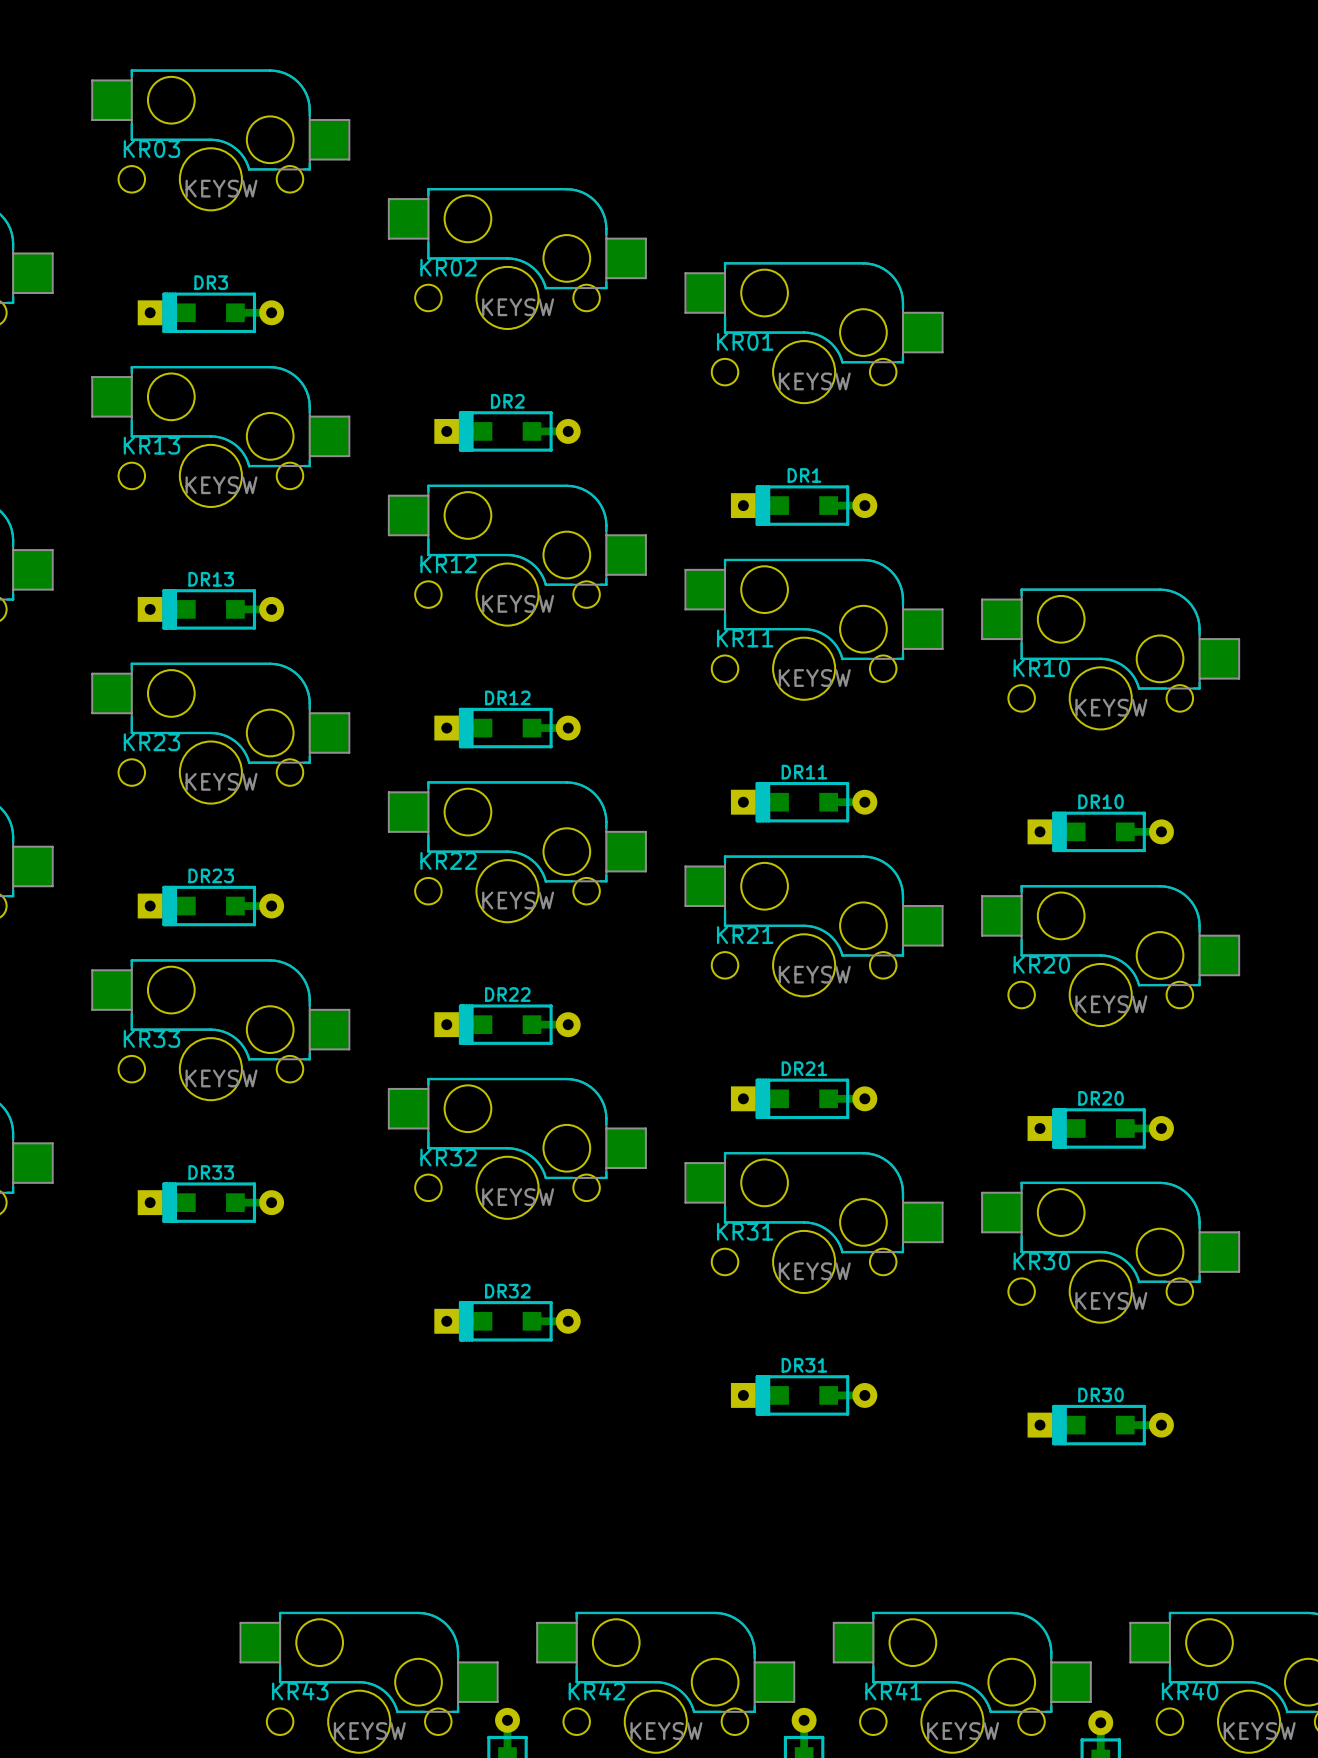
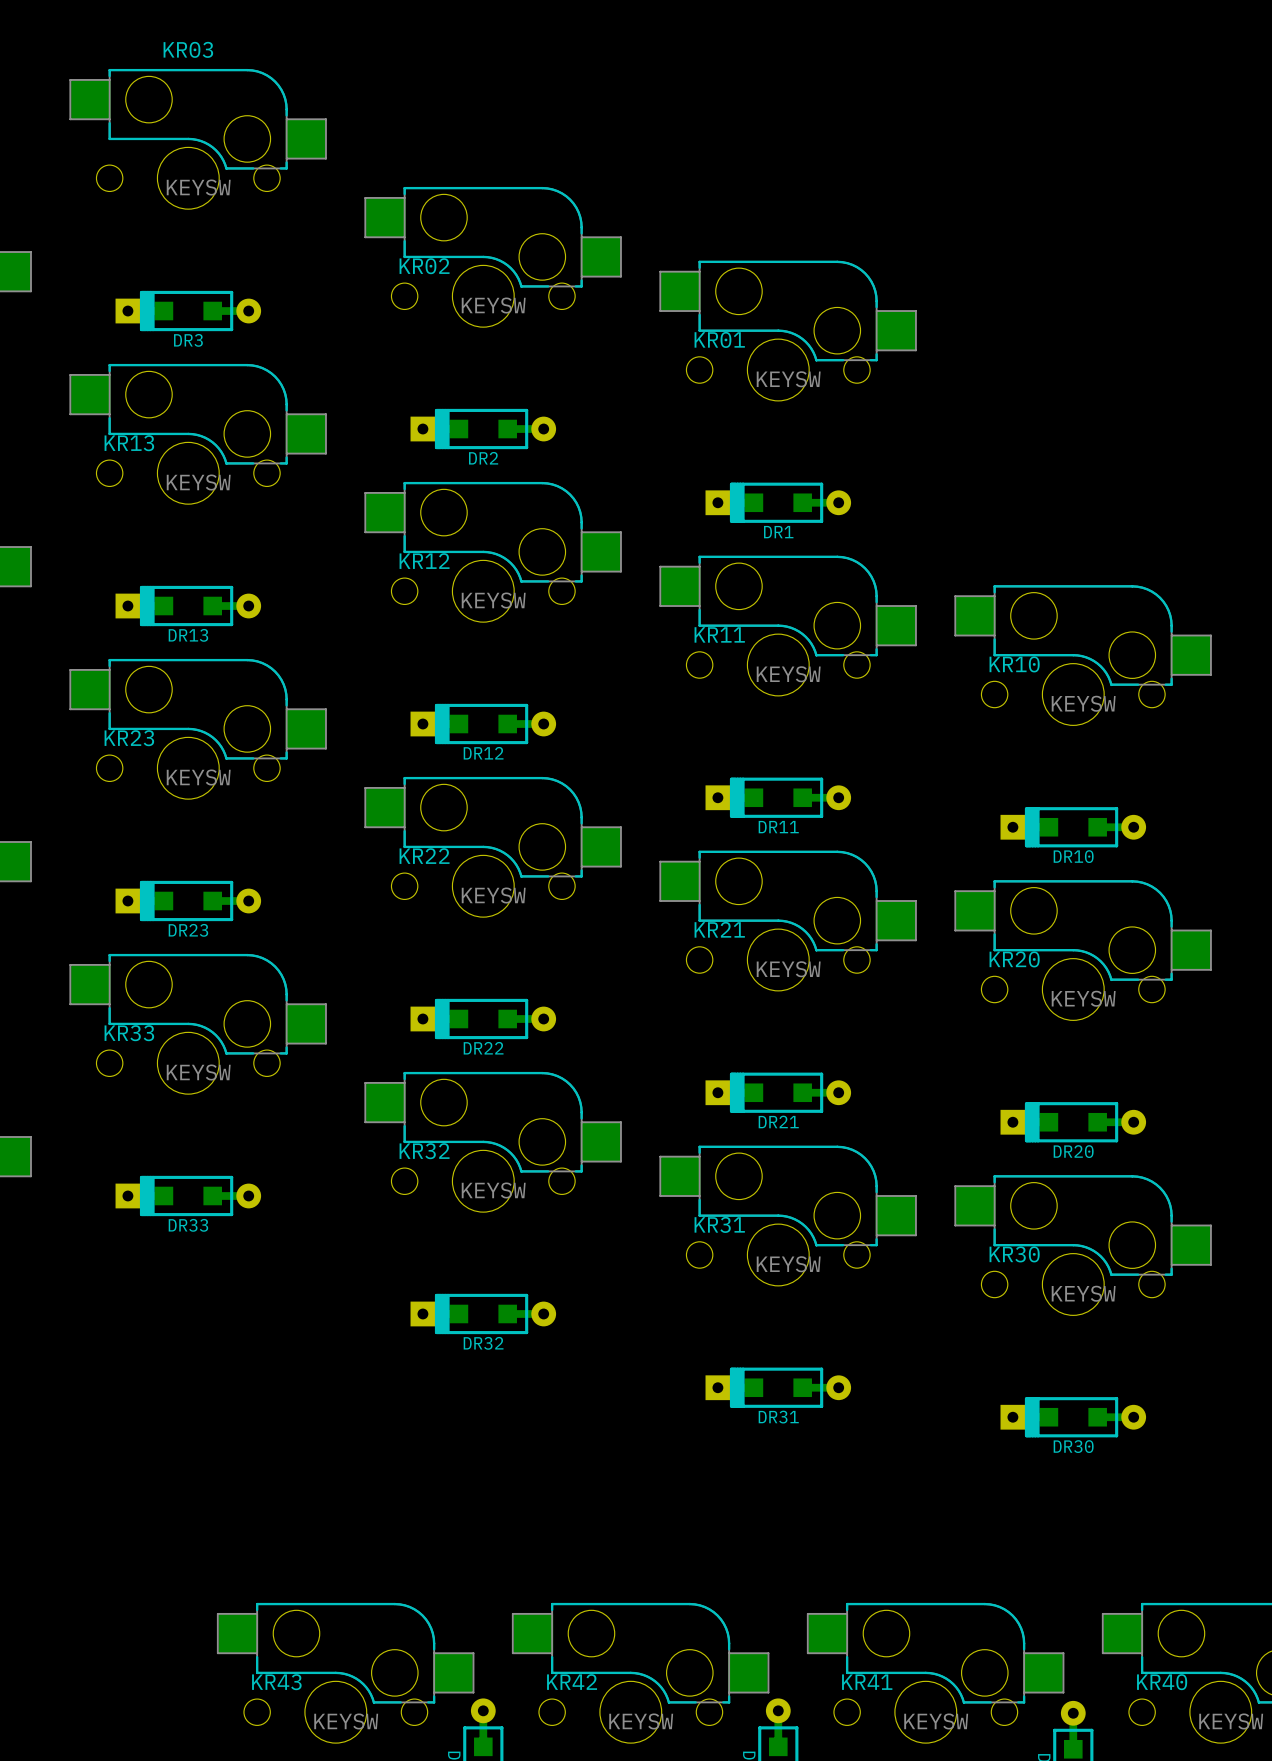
KR03 name position: KR03 (151, 149) -> KR03 (188, 49)
DR3 name position: DR3 (211, 282) -> DR3 (188, 340)
DR2 name position: DR2 (507, 401) -> DR2 (483, 458)
DR1 name position: DR1 (804, 475) -> DR1 (778, 532)
DR13 name position: DR13 (211, 579) -> DR13 (188, 635)
DR12 name position: DR12 (507, 697) -> DR12 (483, 753)
DR11 name position: DR11 (804, 772) -> DR11 (778, 827)
DR10 name position: DR10 (1101, 801) -> DR10 (1073, 856)
DR23 name position: DR23 (211, 875) -> DR23 (188, 930)
DR22 name position: DR22 (507, 994) -> DR22 (483, 1048)
DR21 name position: DR21 (804, 1068) -> DR21 (778, 1121)
DR20 name position: DR20 (1101, 1098) -> DR20 (1073, 1151)
DR33 name position: DR33 (211, 1172) -> DR33 (188, 1225)
DR32 name position: DR32 (507, 1291) -> DR32 (483, 1343)
DR31 name position: DR31 (804, 1365) -> DR31 (778, 1417)
DR30 name position: DR30 (1101, 1394) -> DR30 (1073, 1446)

